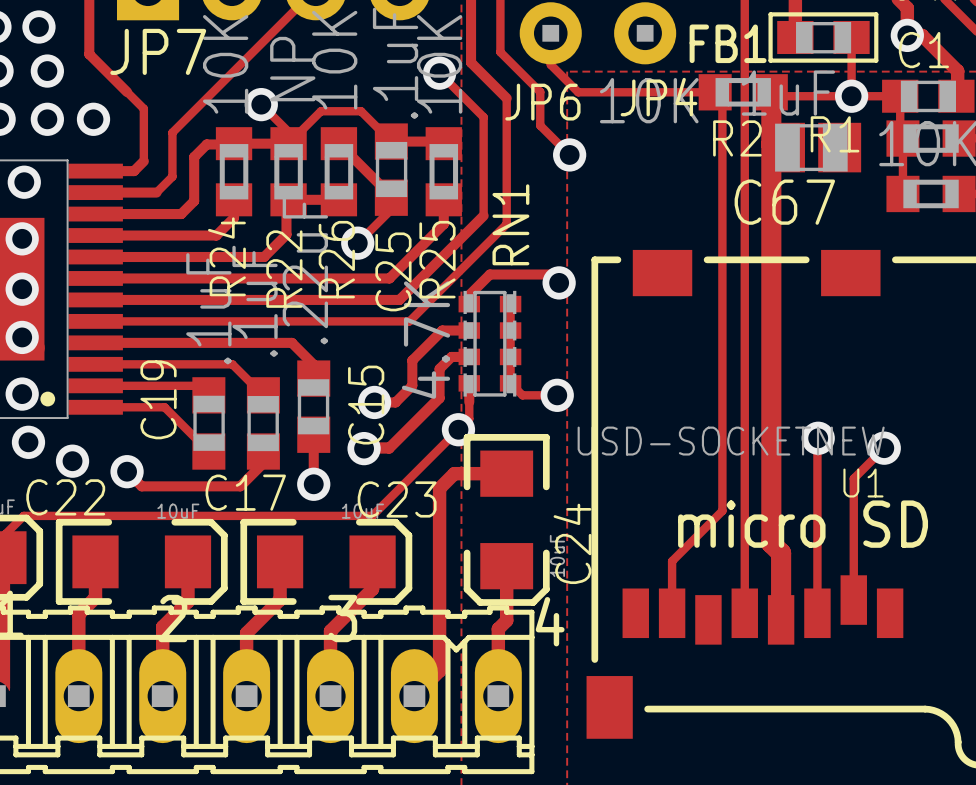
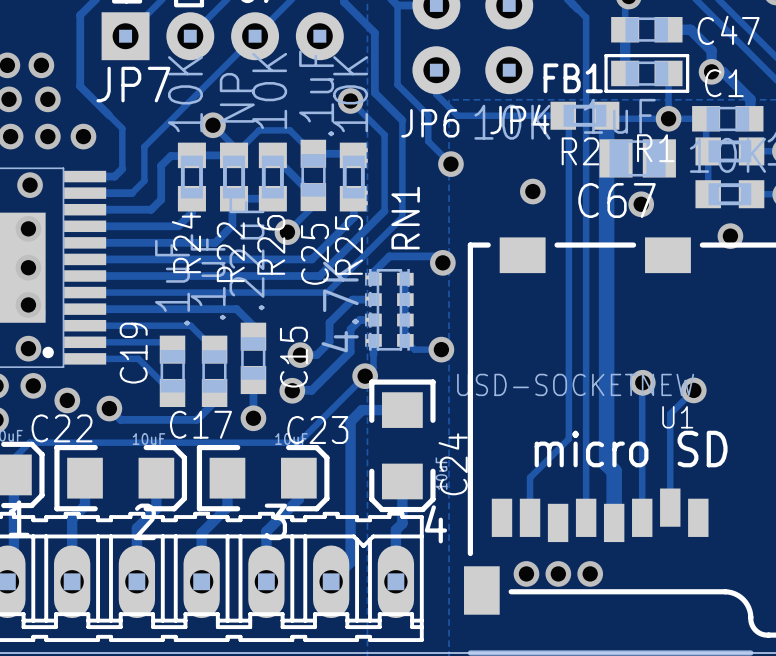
via: none -> (532, 191)
via: none -> (641, 204)
via: none -> (730, 236)
via: none -> (526, 573)
via: none -> (558, 573)
via: none -> (590, 573)

